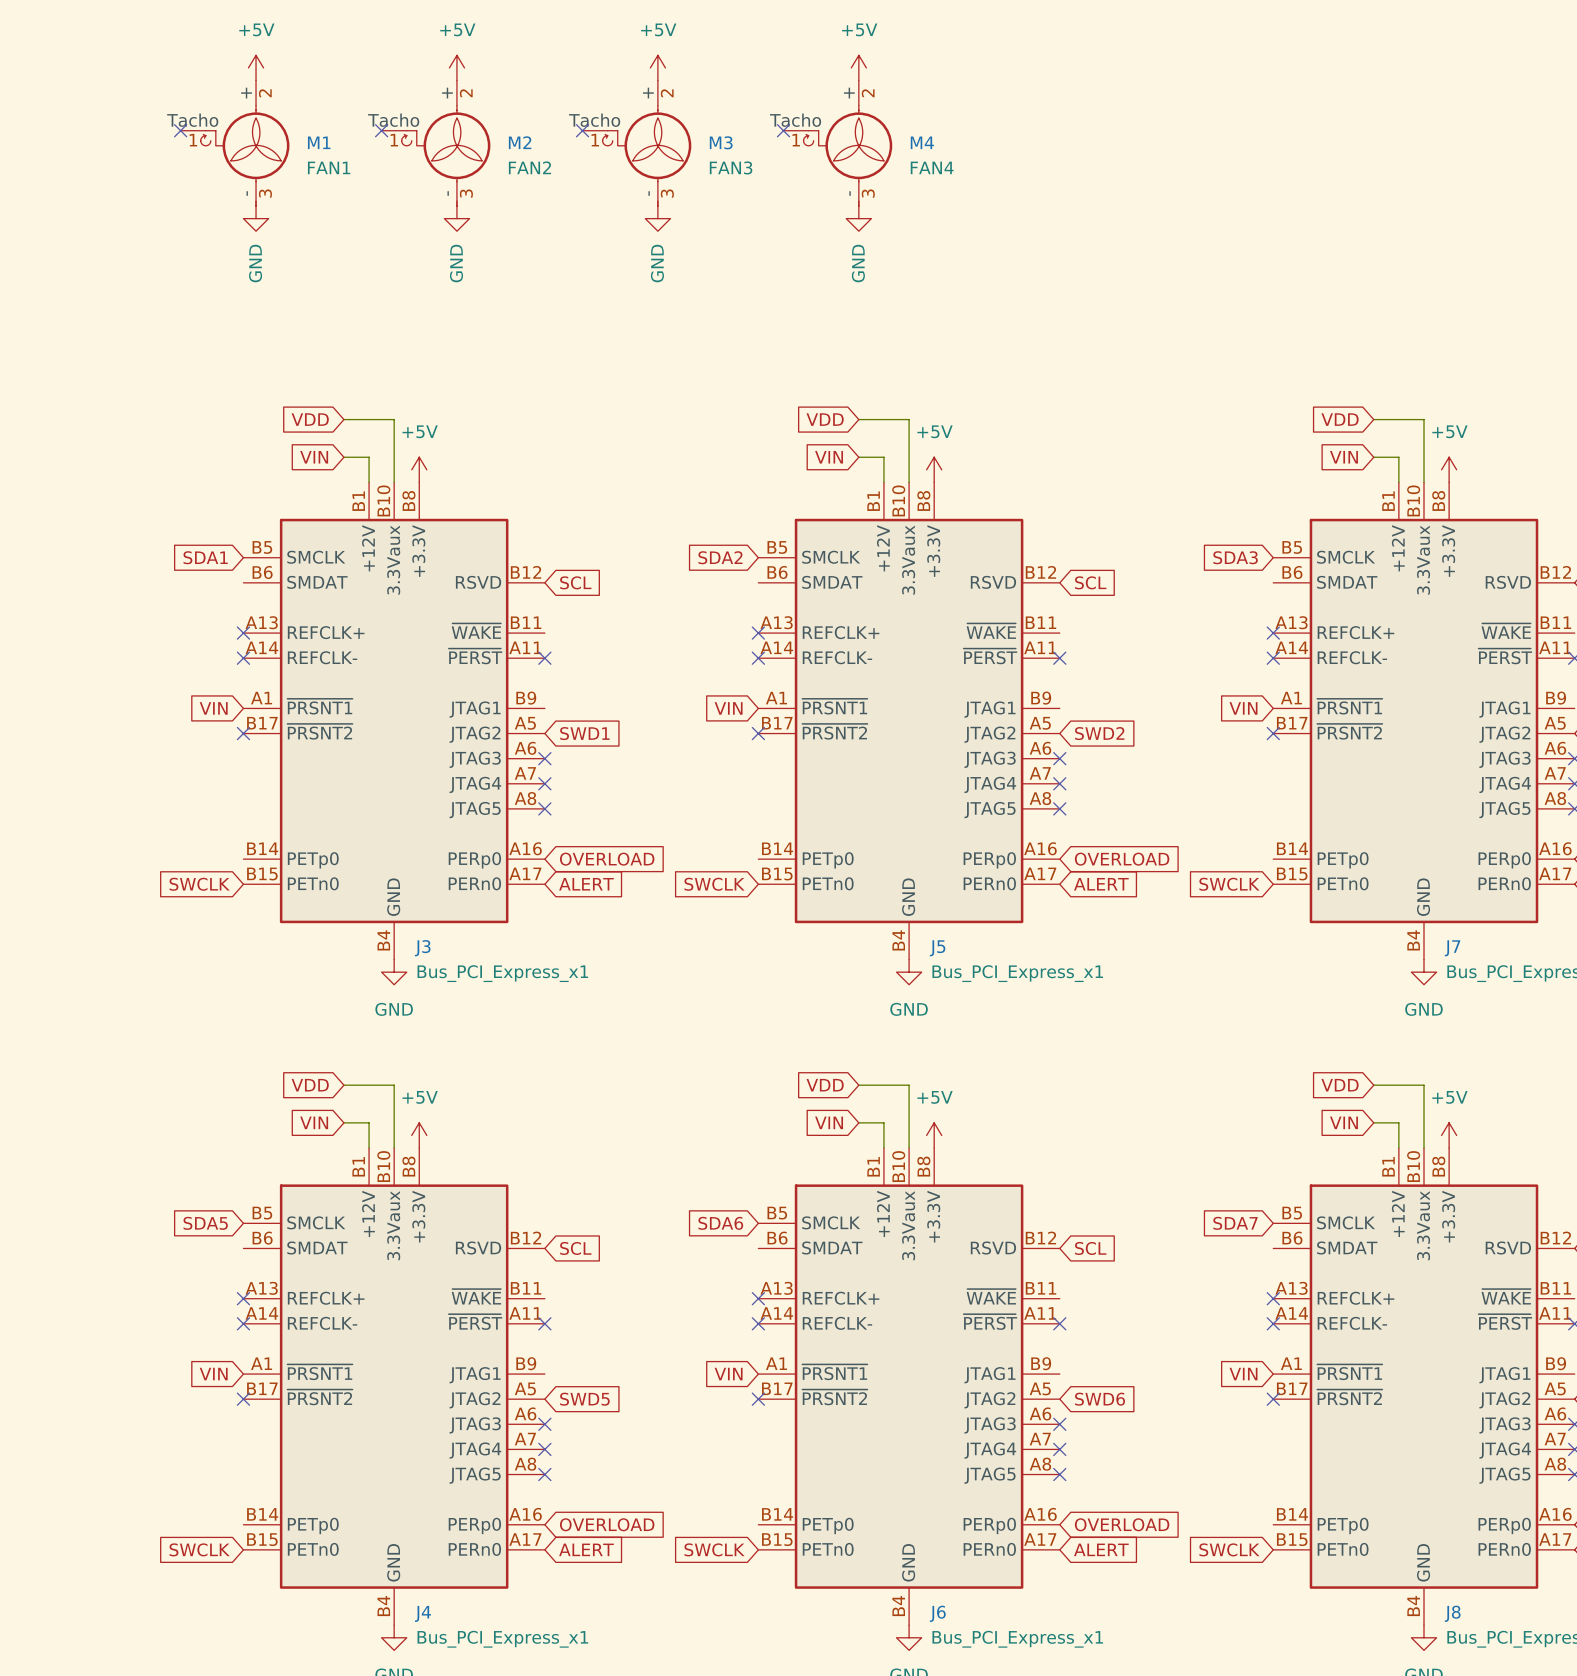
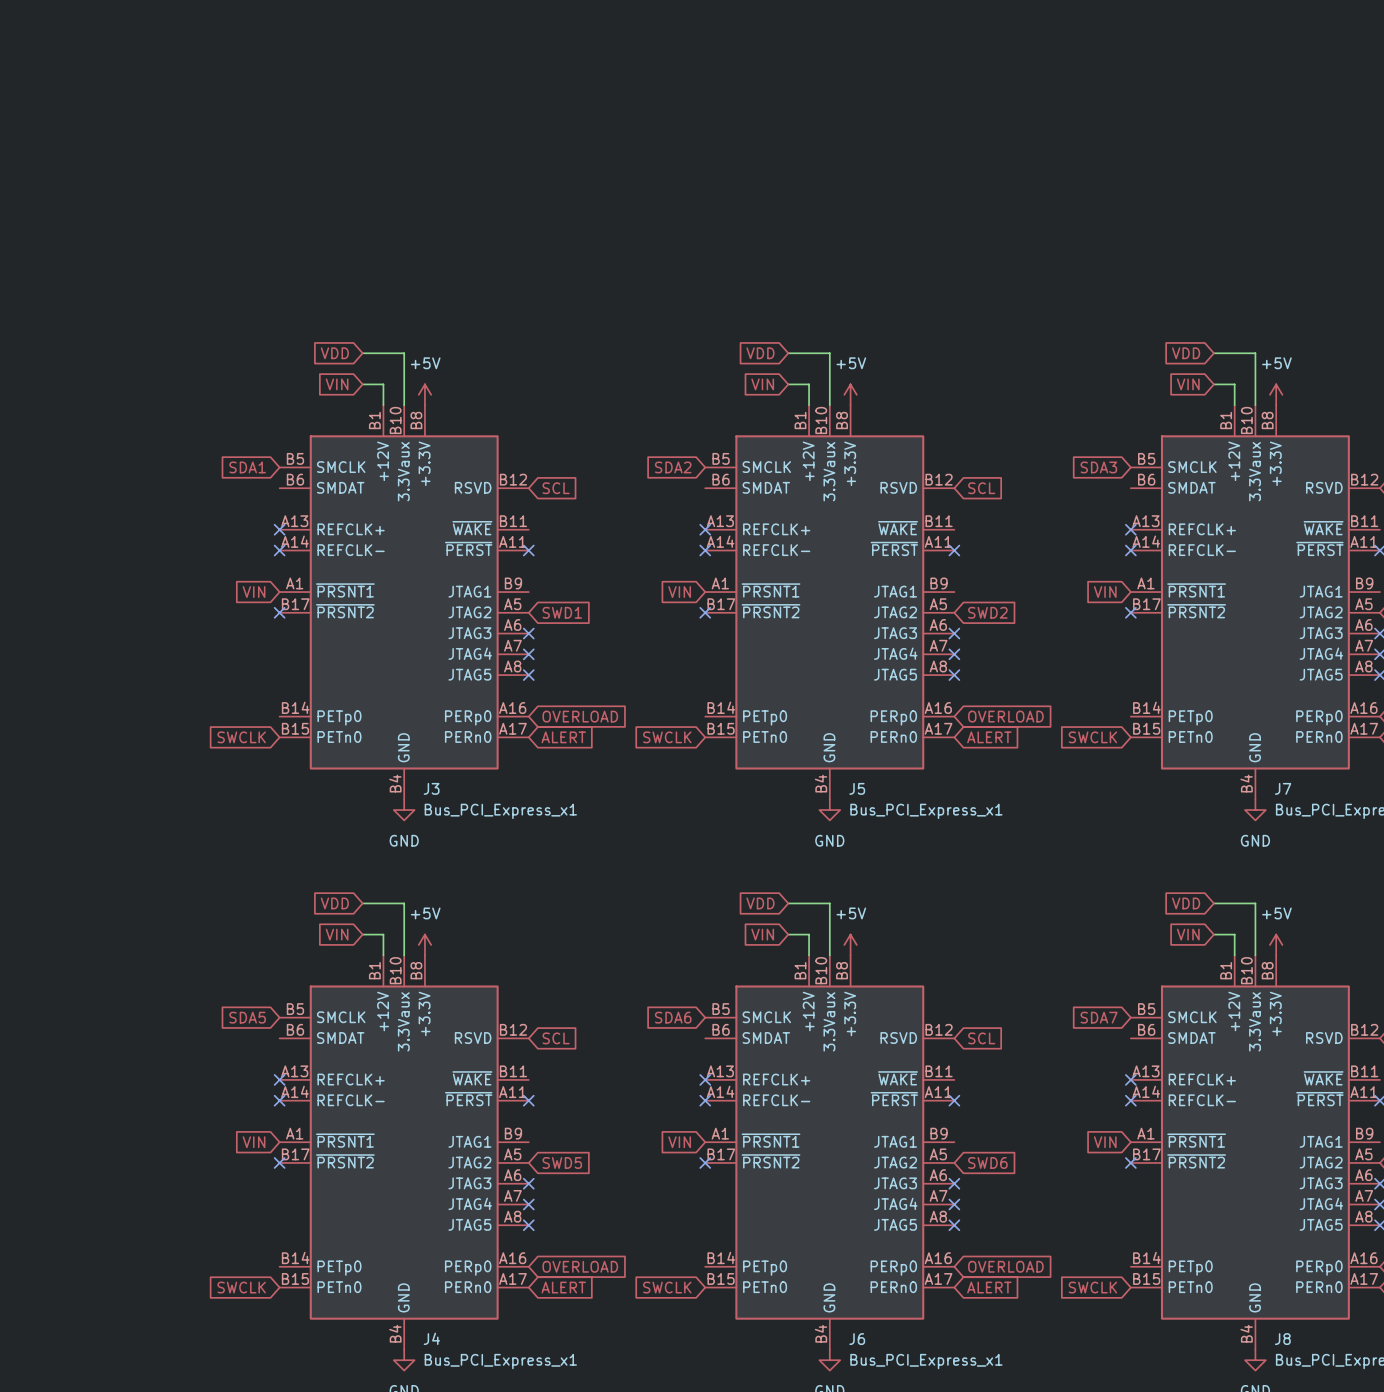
power symbol: +5V (256, 67) -> none
power symbol: +5V (456, 67) -> none
power symbol: +5V (657, 67) -> none
power symbol: +5V (858, 67) -> none
no-connect mark: (180, 130) -> none
no-connect mark: (381, 130) -> none
no-connect mark: (582, 130) -> none
no-connect mark: (783, 130) -> none
M1: FAN1 (235, 143) -> none
M2: FAN2 (435, 143) -> none
M3: FAN3 (636, 143) -> none
M4: FAN4 (837, 143) -> none
power symbol: GND (256, 218) -> none
power symbol: GND (456, 218) -> none
power symbol: GND (657, 218) -> none
power symbol: GND (858, 218) -> none

